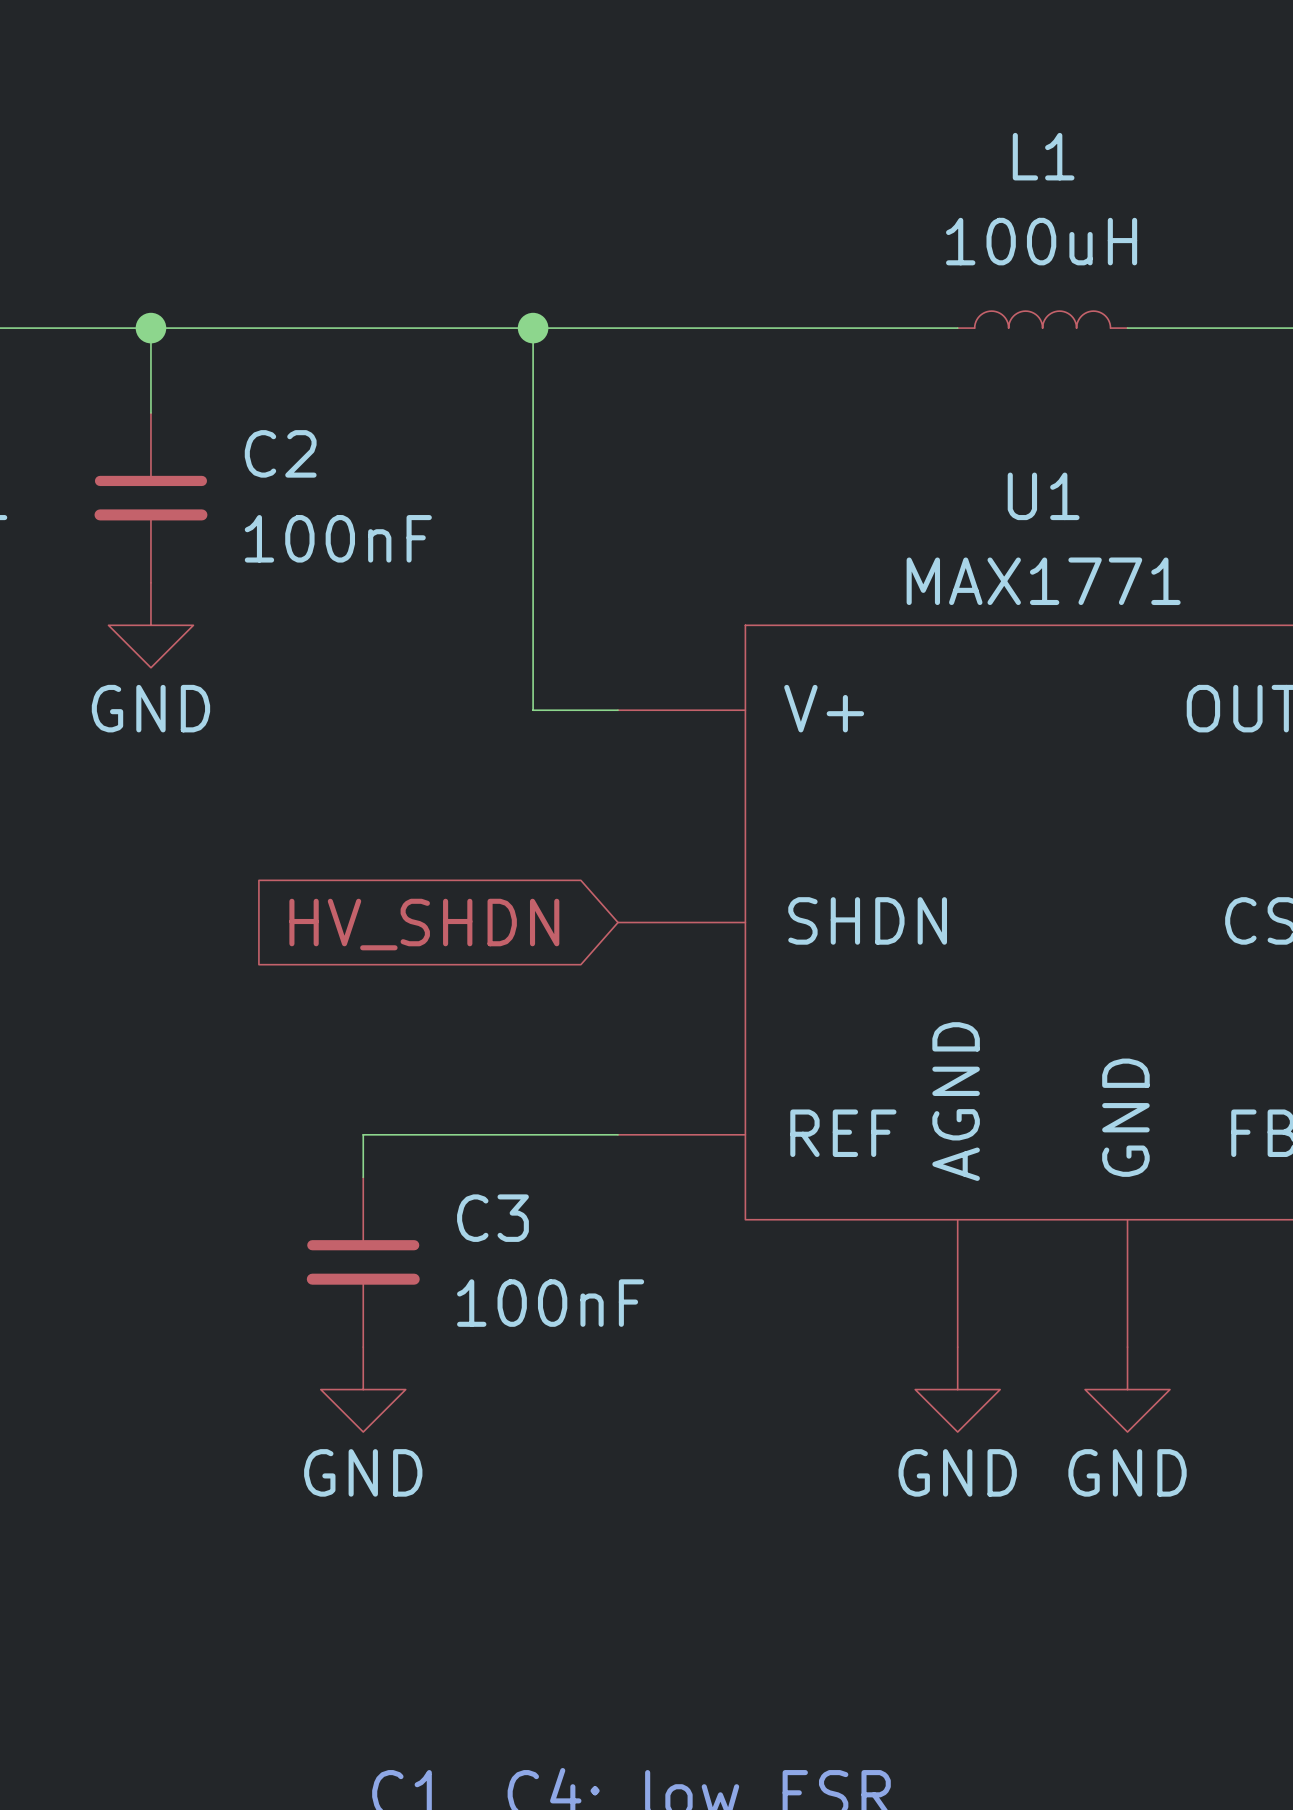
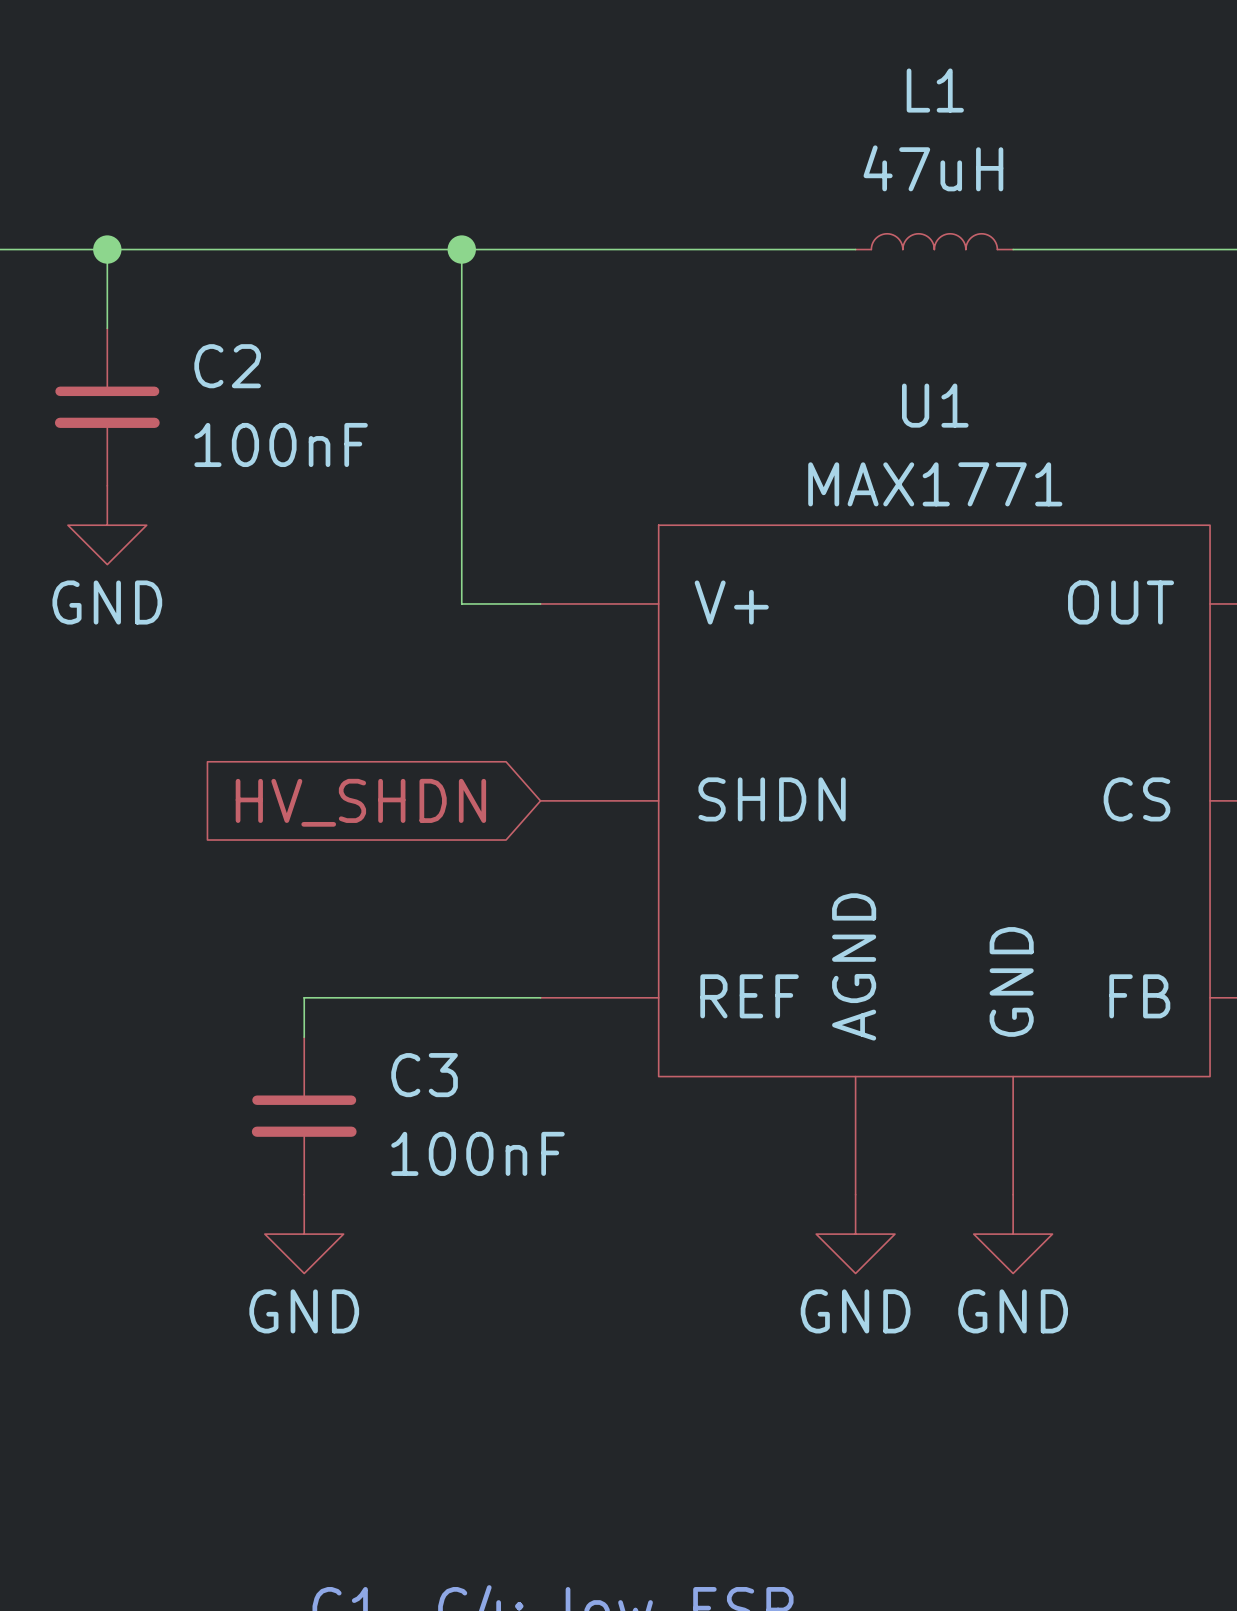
L1 value: 100uH (1041, 241) -> 47uH (933, 168)

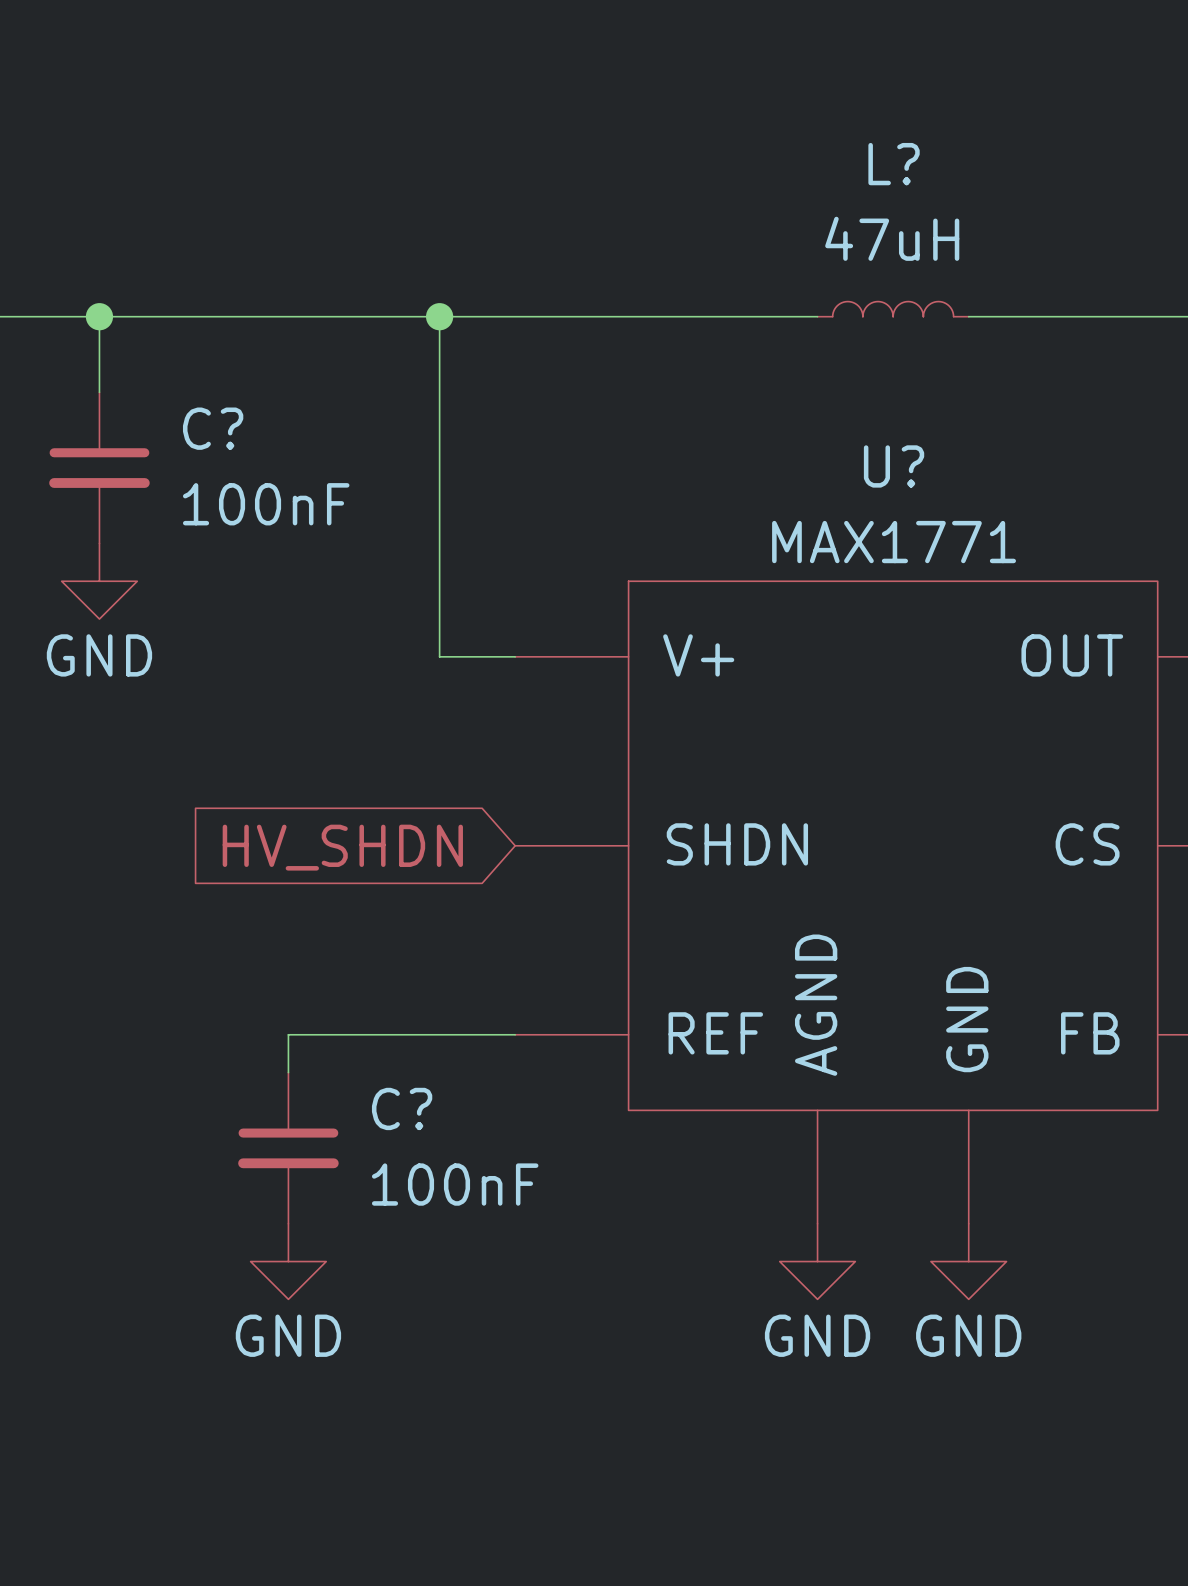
L1 name: L1 (935, 90) -> L? (894, 164)
C2 name: C2 (227, 366) -> C? (213, 428)
U1 name: U1 (935, 405) -> U? (894, 466)
C3 name: C3 (424, 1075) -> C? (402, 1108)

